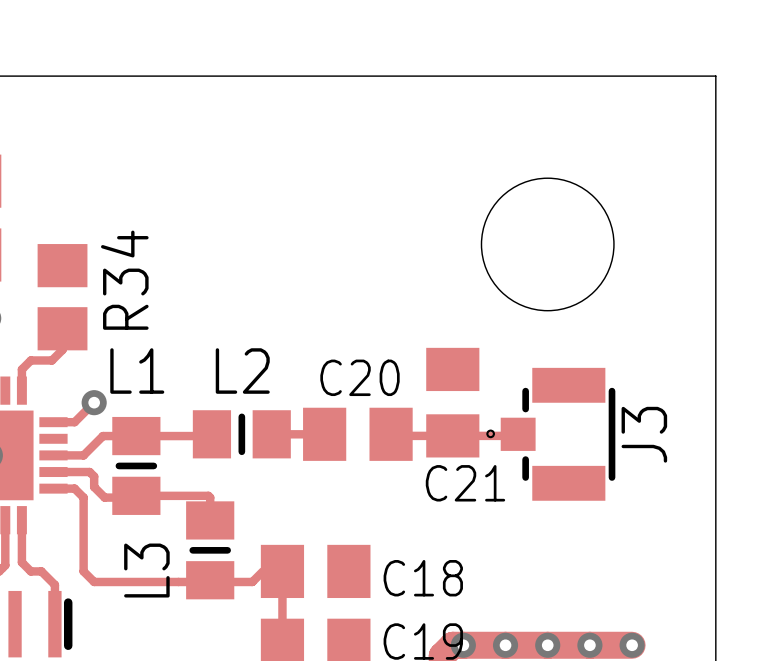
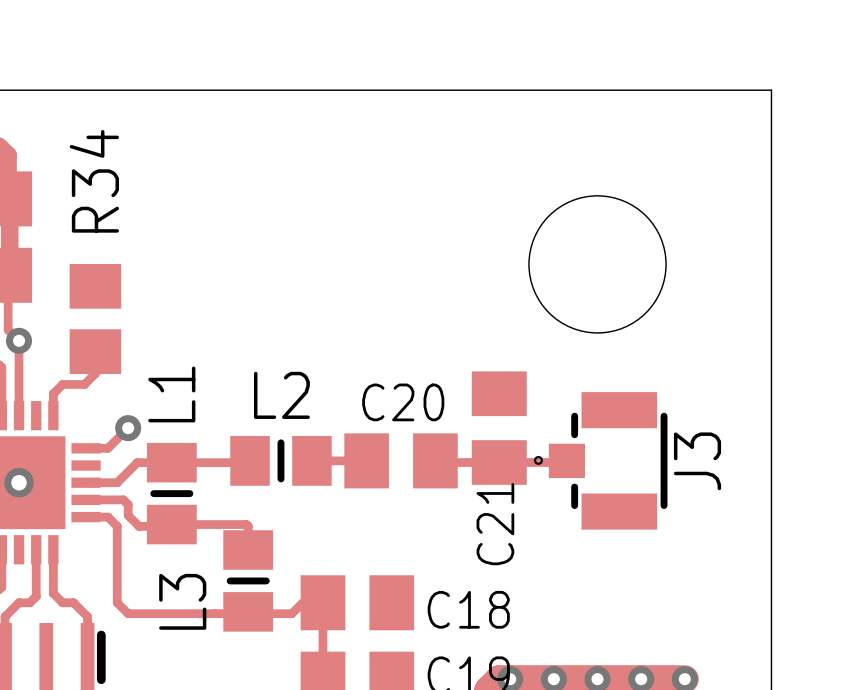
R34 name position: R34 (124, 280) -> R34 (94, 181)
L1 name rotation: 0° (137, 371) -> 90° counterclockwise (171, 394)
C21 name rotation: 0° (465, 483) -> 90° counterclockwise (495, 524)

